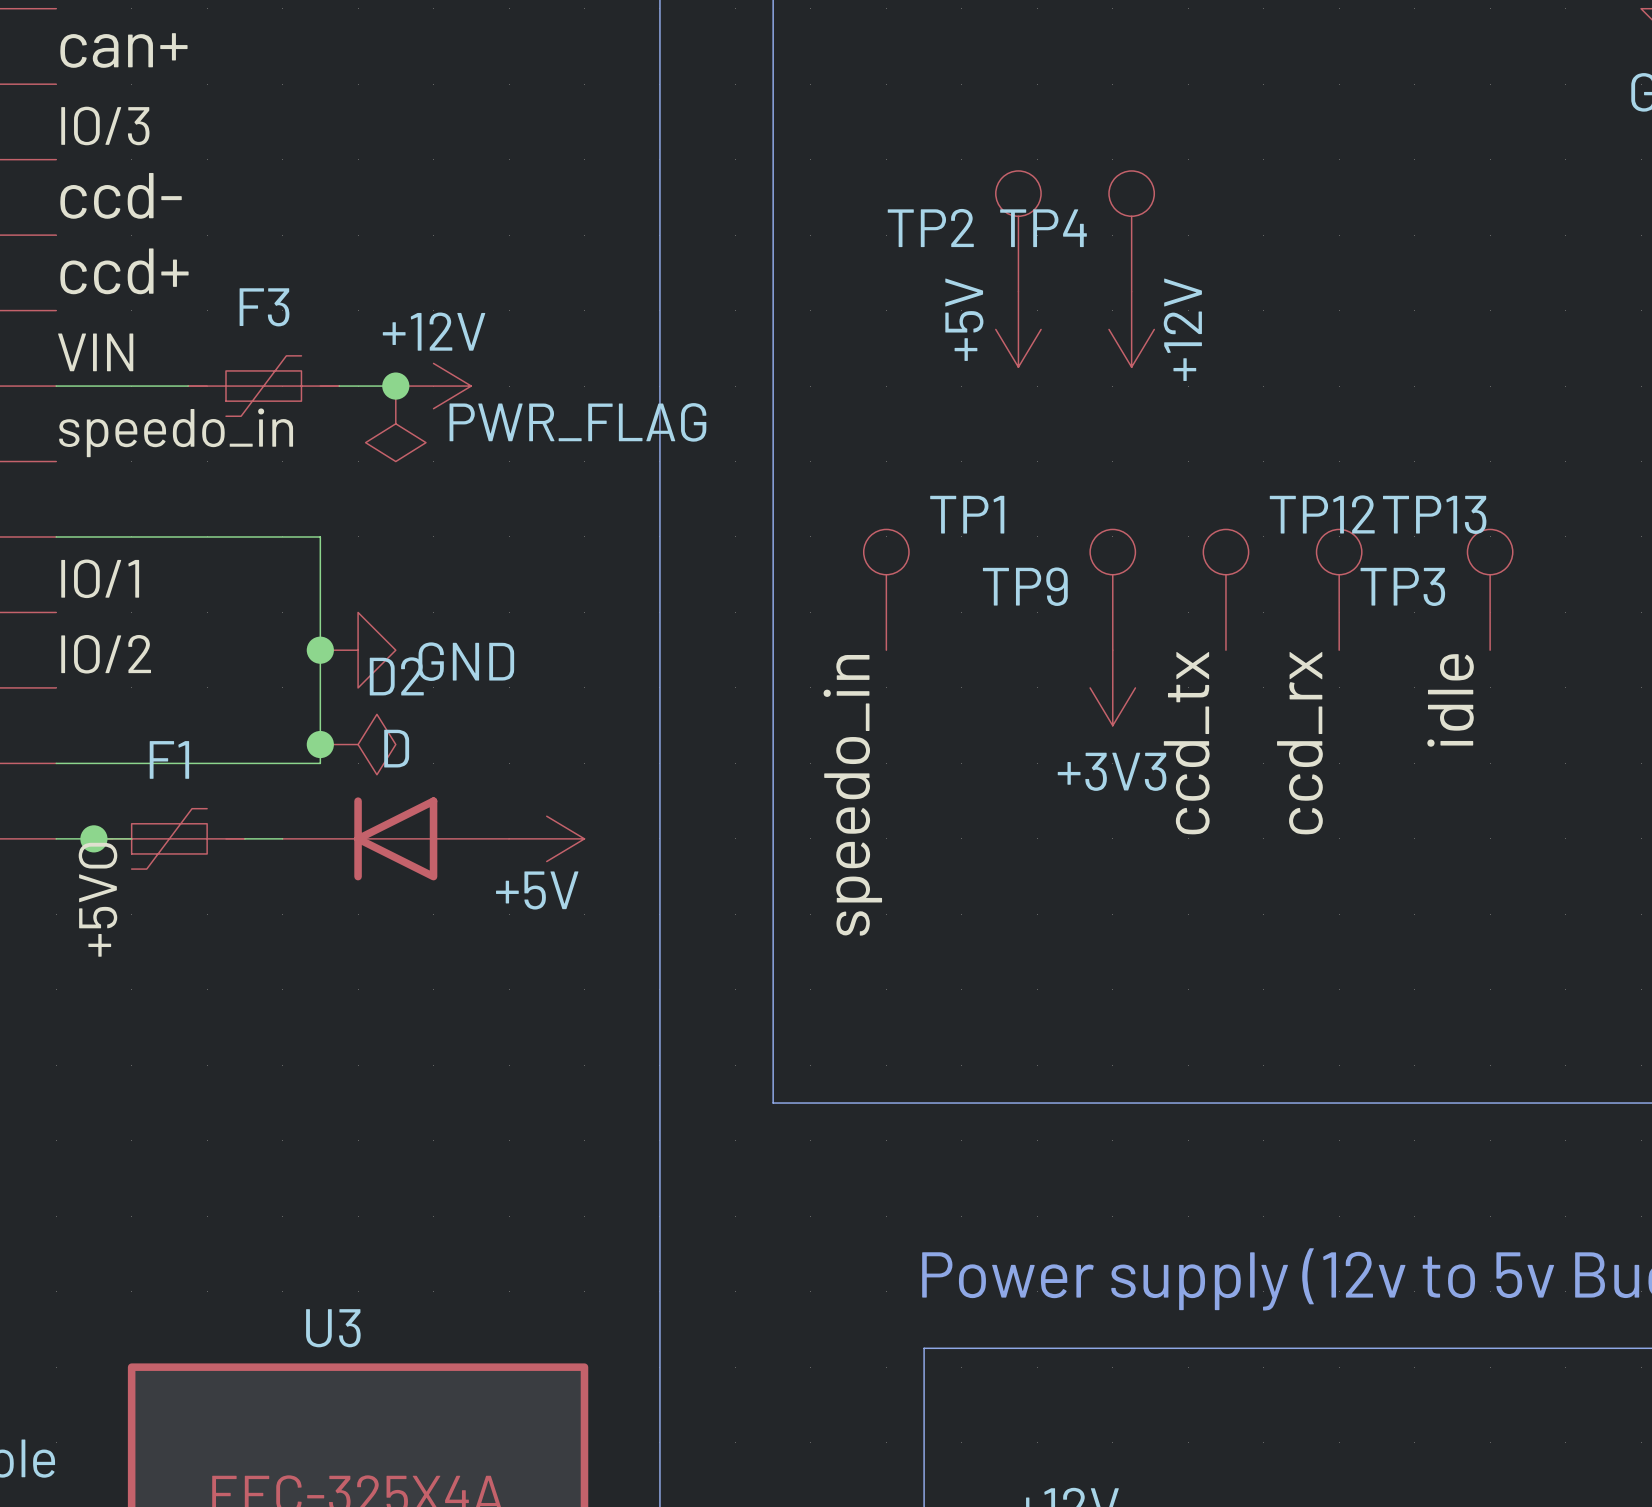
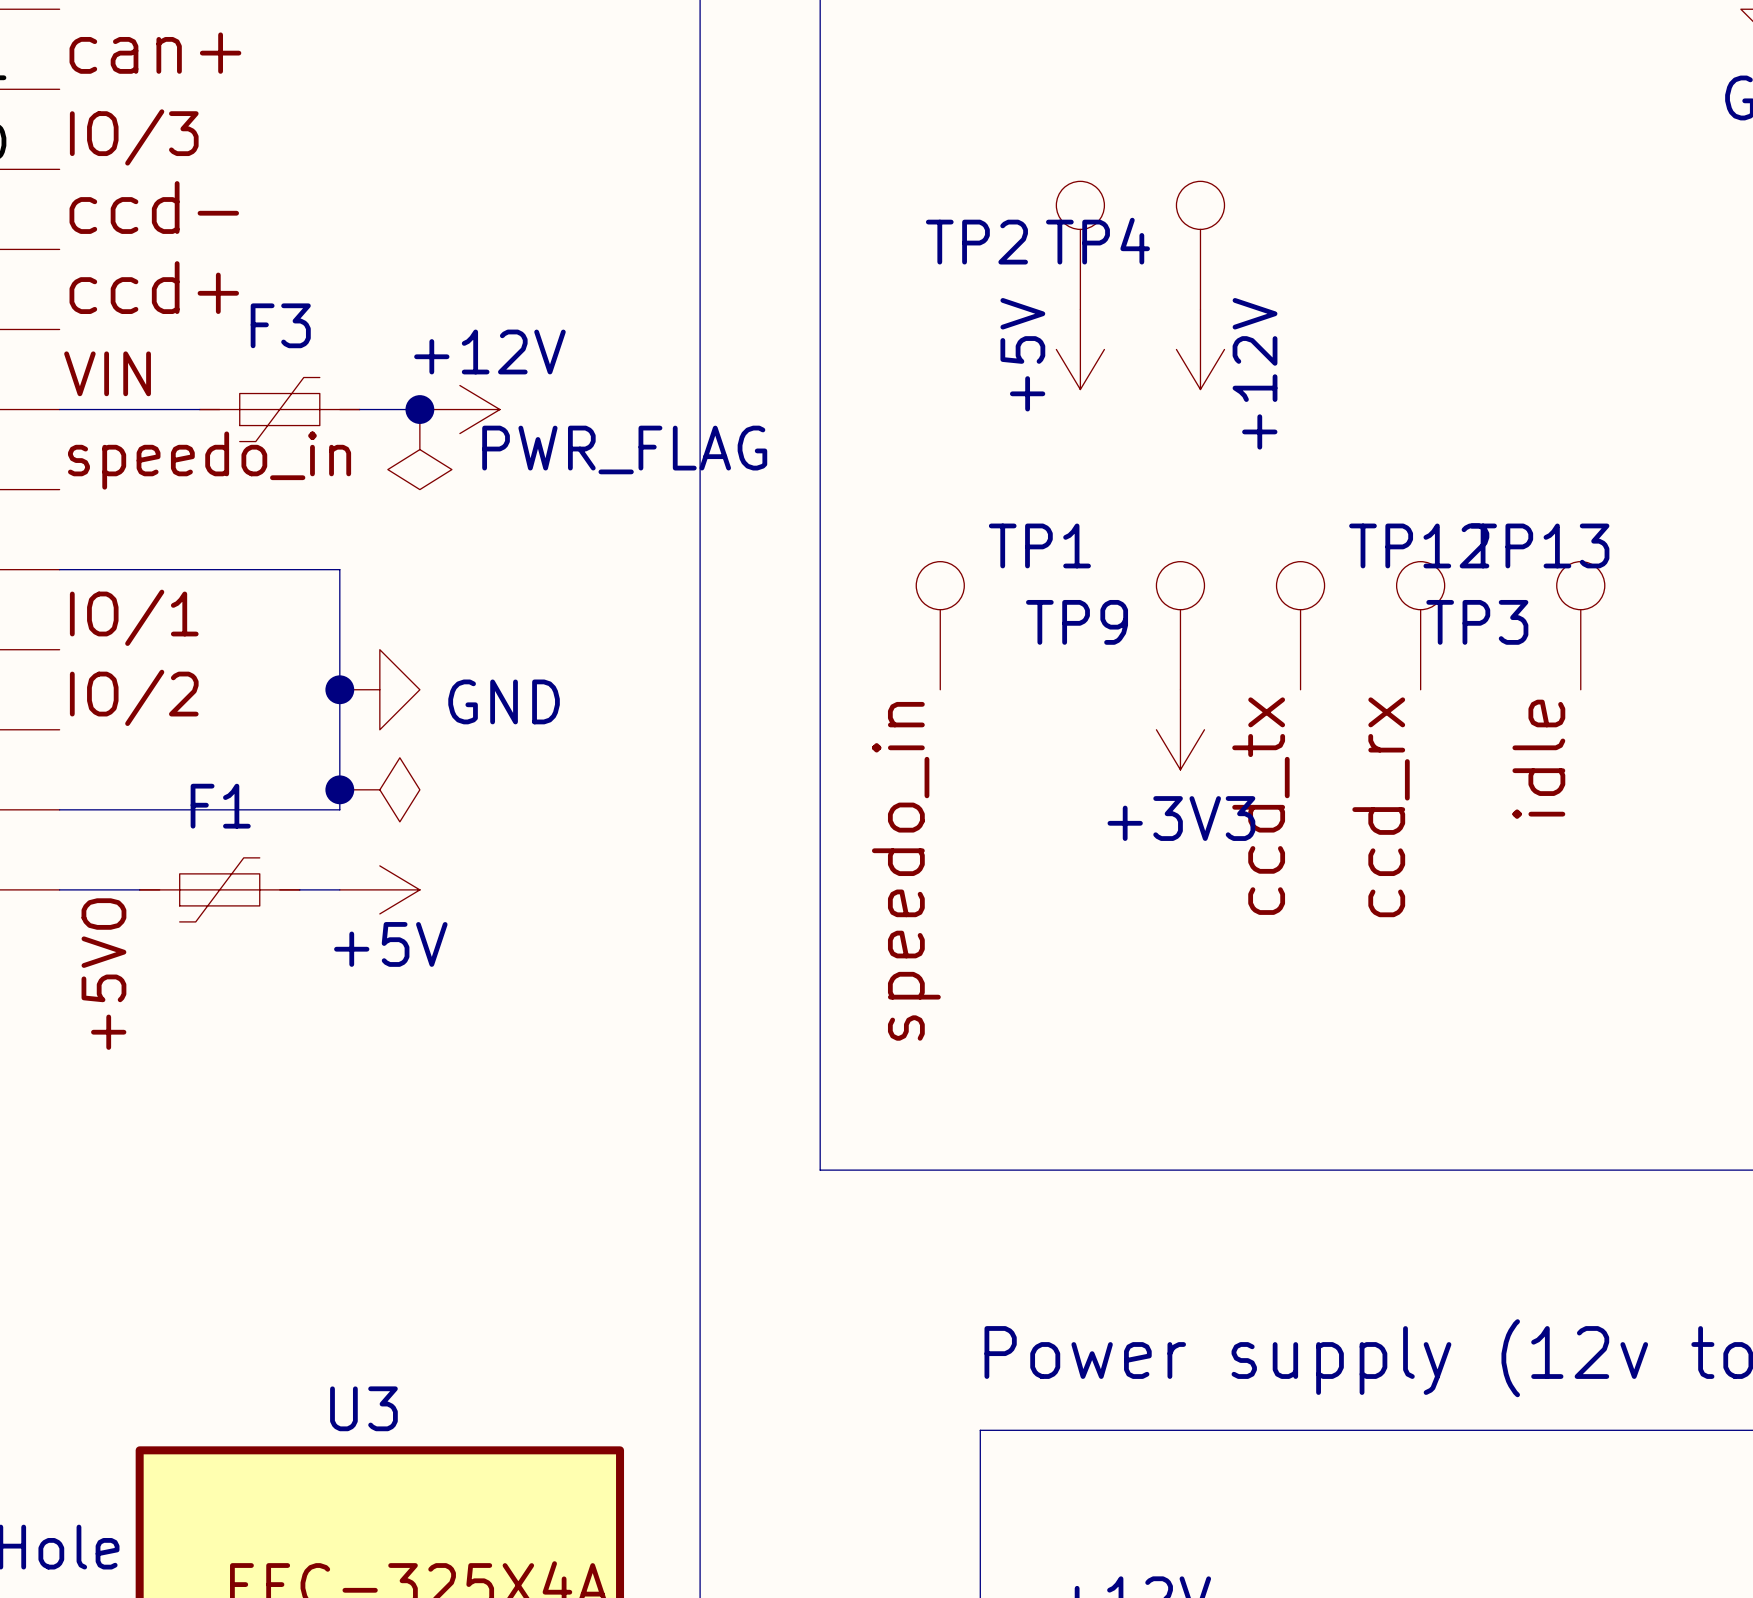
junction: (93, 838) -> none
F1 position: (169, 838) -> (219, 889)
D2: D (395, 838) -> none
power symbol position: +5V (546, 838) -> +5V (379, 889)

